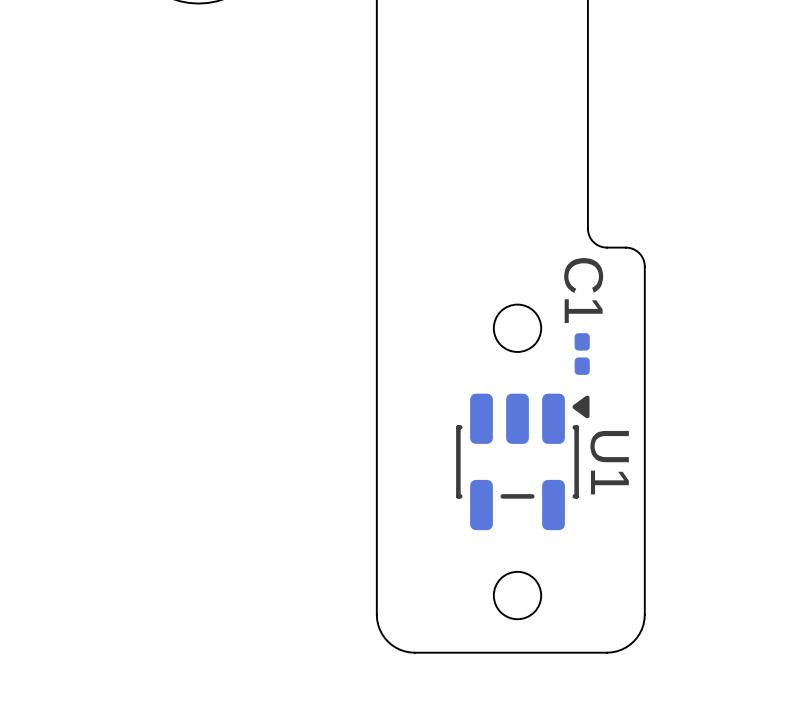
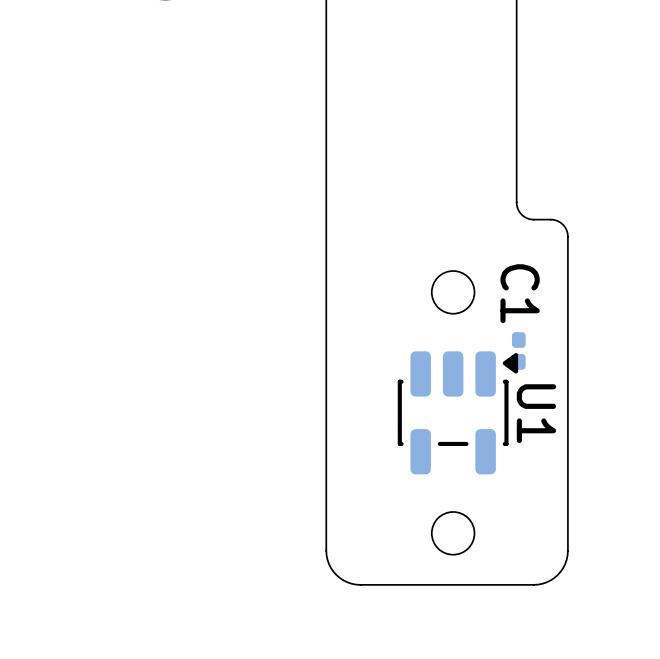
C1 position: (582, 354) -> (518, 350)

